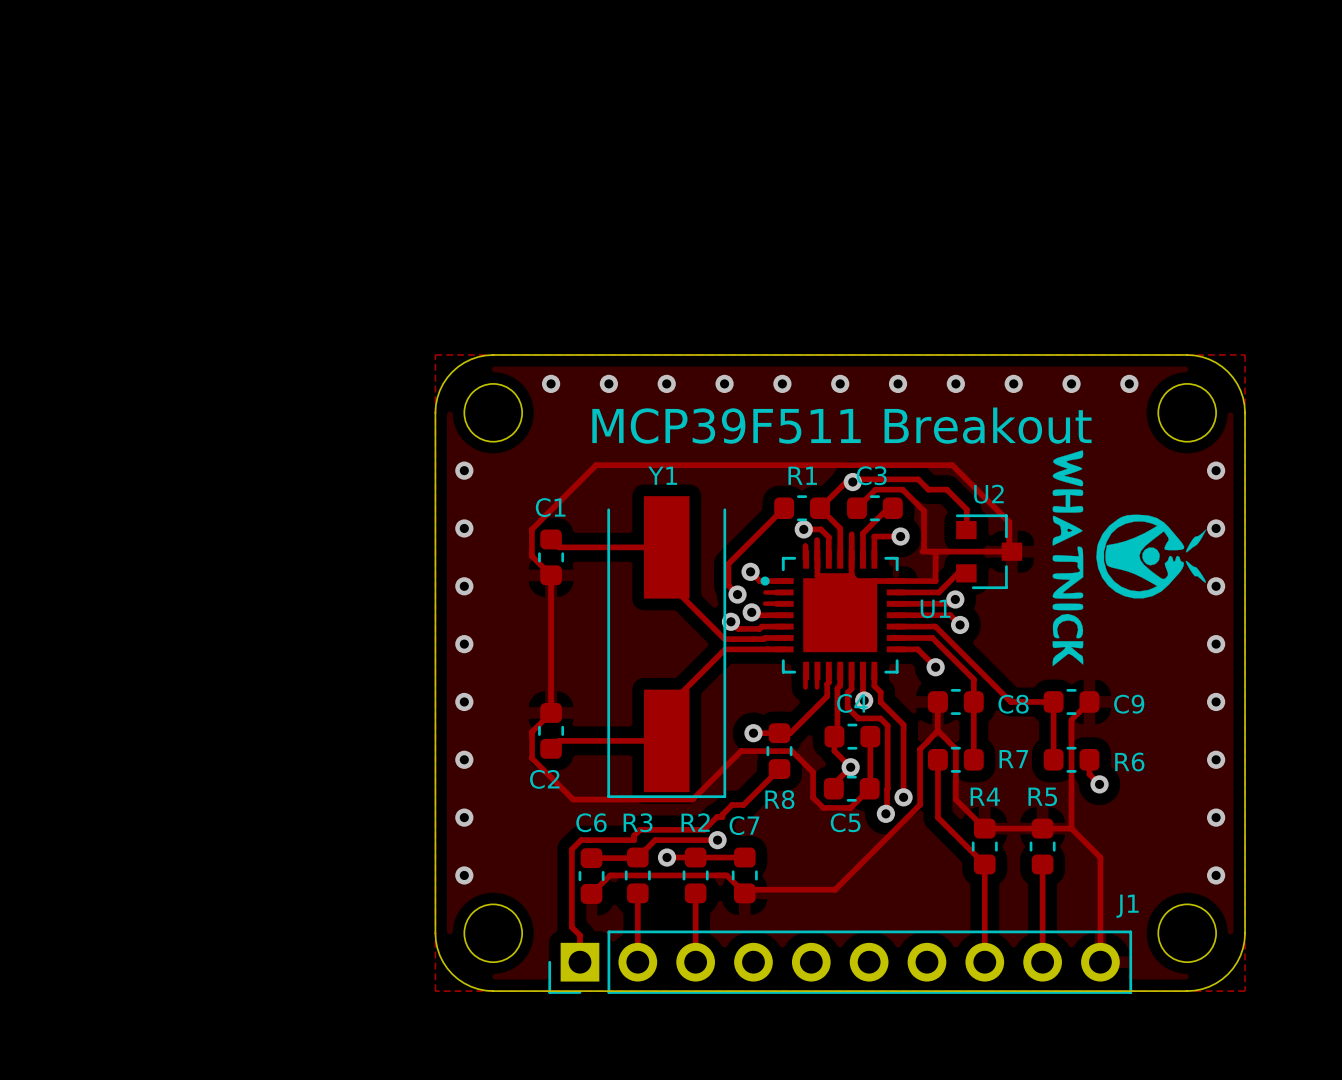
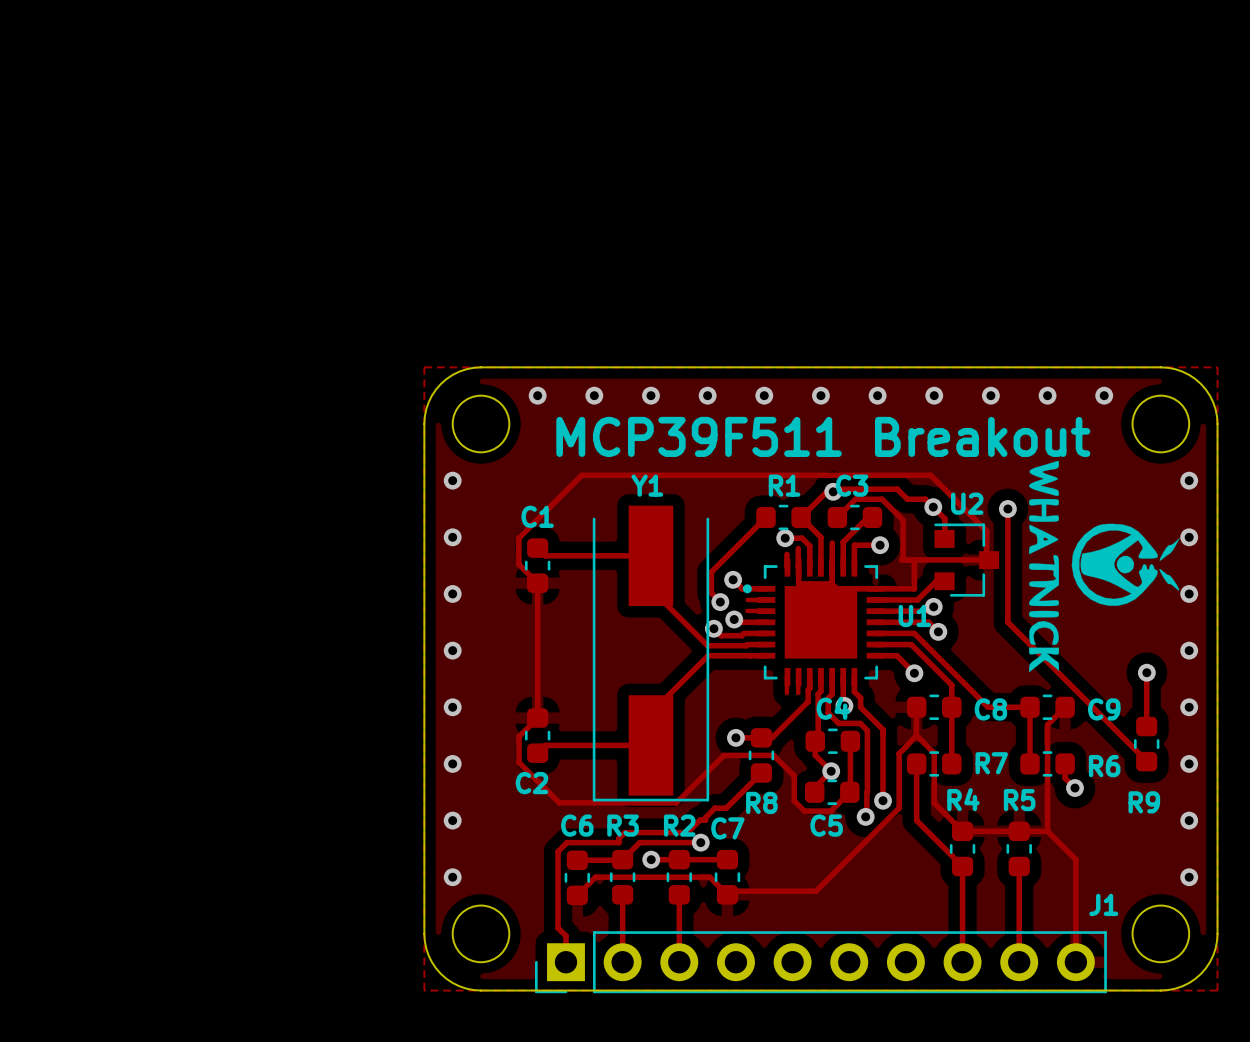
via: none -> (933, 507)
track: none -> (1007, 508) (1007, 622) (1146, 761)
via: none -> (1007, 508)
track: none -> (1146, 672) (1146, 726)
via: none -> (1146, 672)
R9: none -> (1146, 744)

